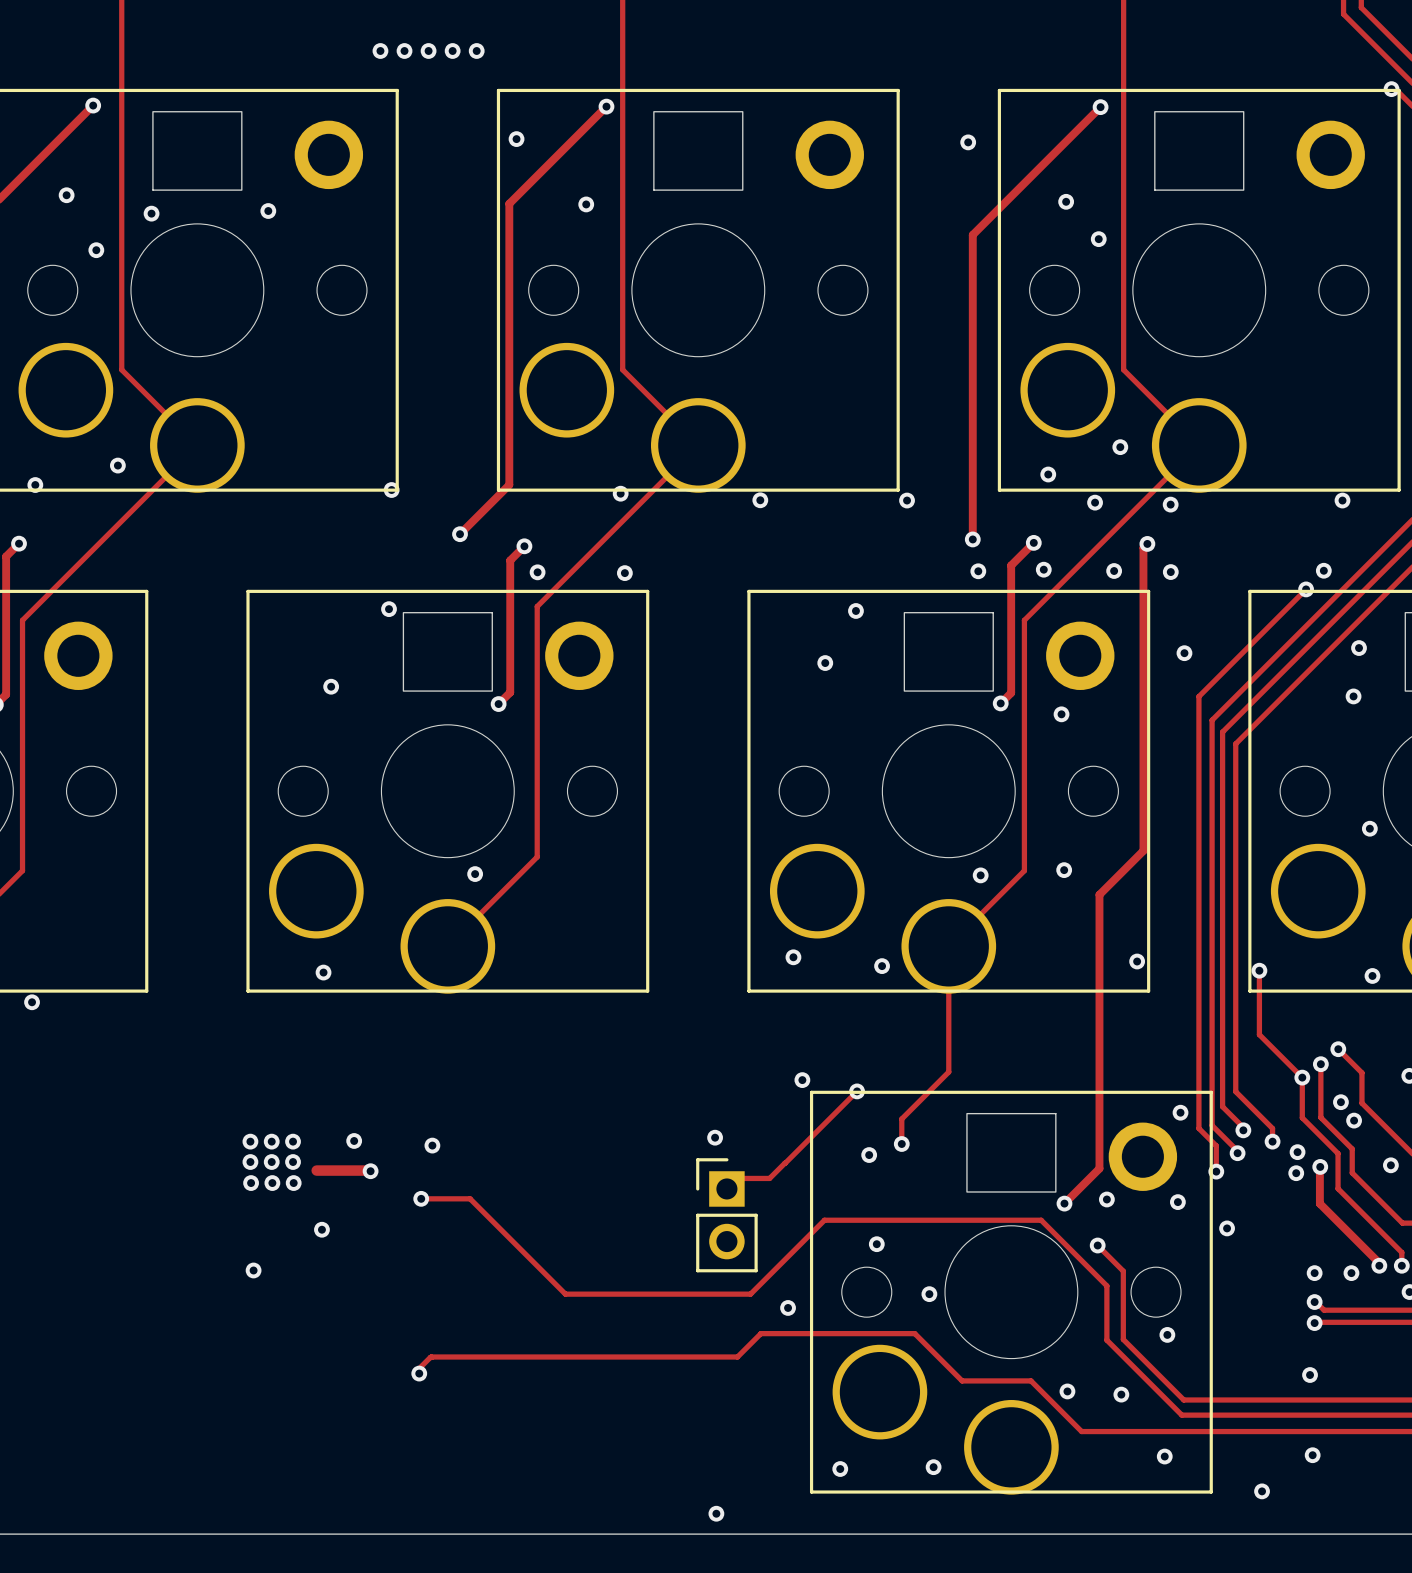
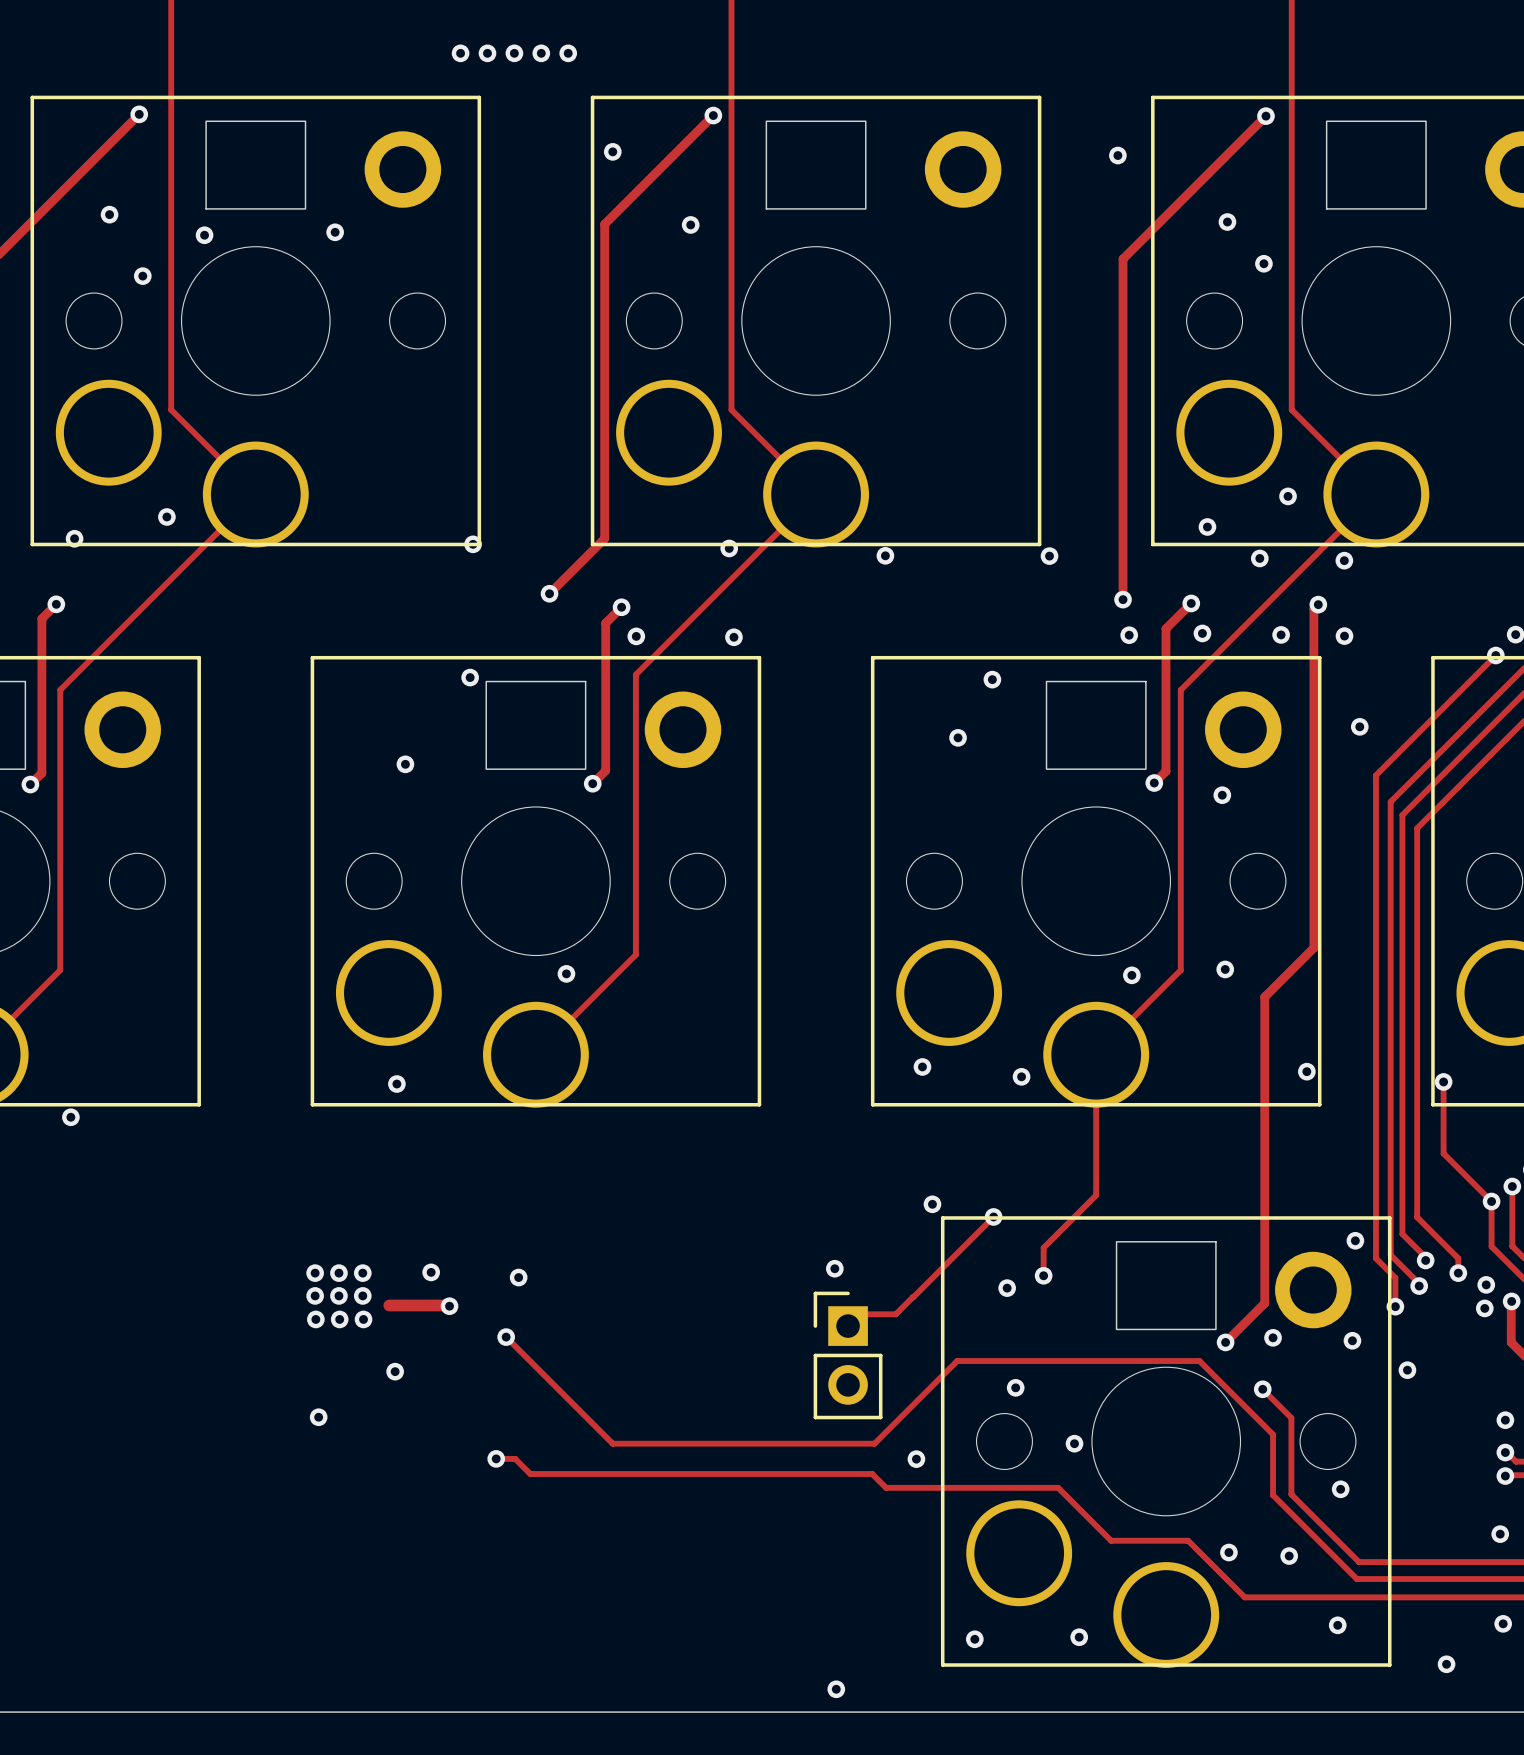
track: (421, 1198) (470, 1198) (565, 1294) -> (506, 1337) (612, 1443) (667, 1443)
track: (760, 1333) (737, 1357) (431, 1357) (419, 1368) (419, 1373) -> (886, 1487) (872, 1474) (530, 1474) (515, 1458) (496, 1458)
via position: (419, 1373) -> (496, 1458)

